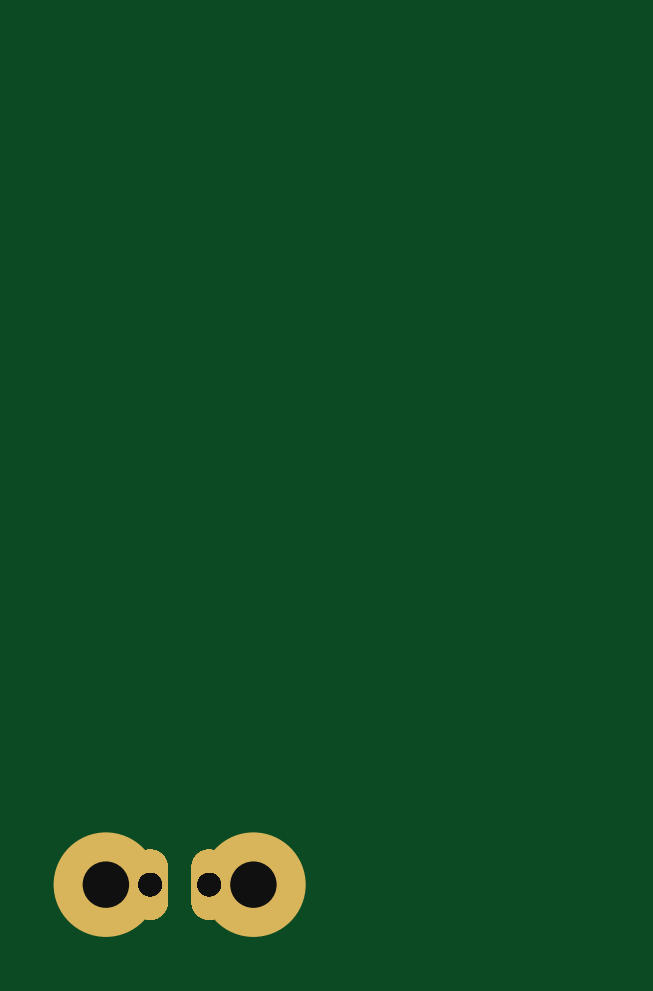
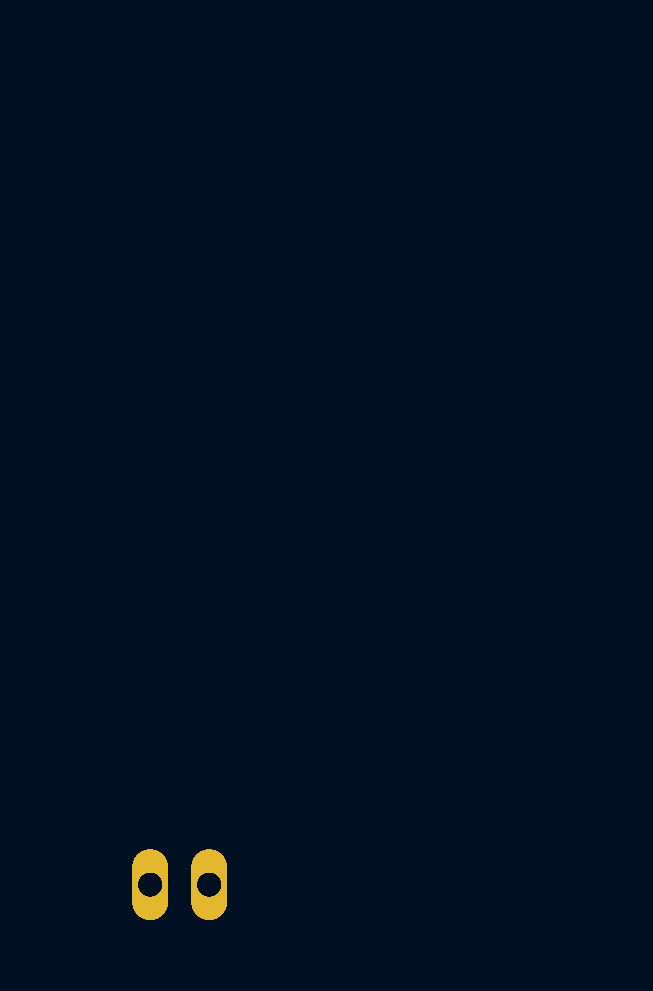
part: (179, 884) -> none

